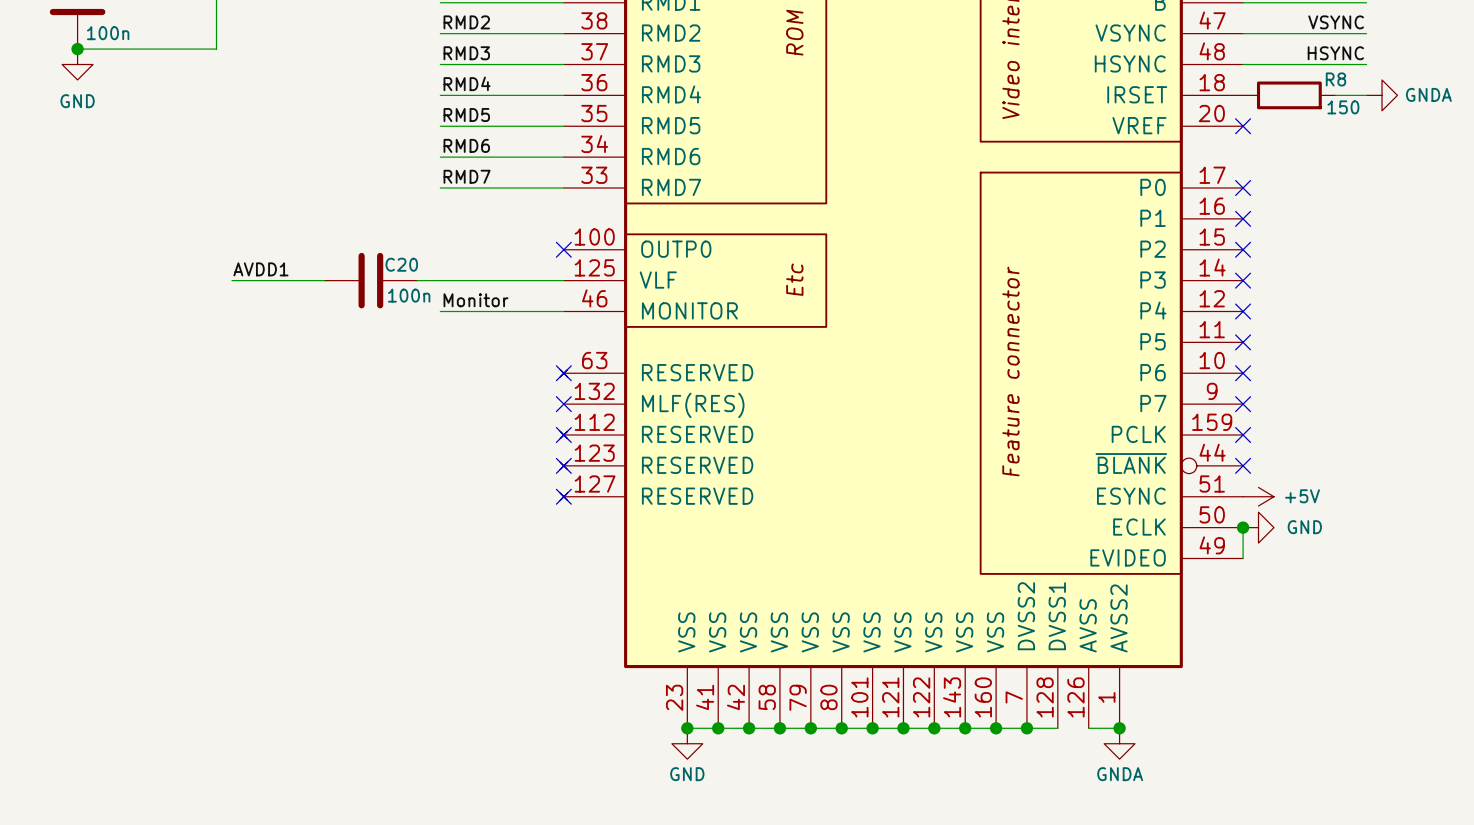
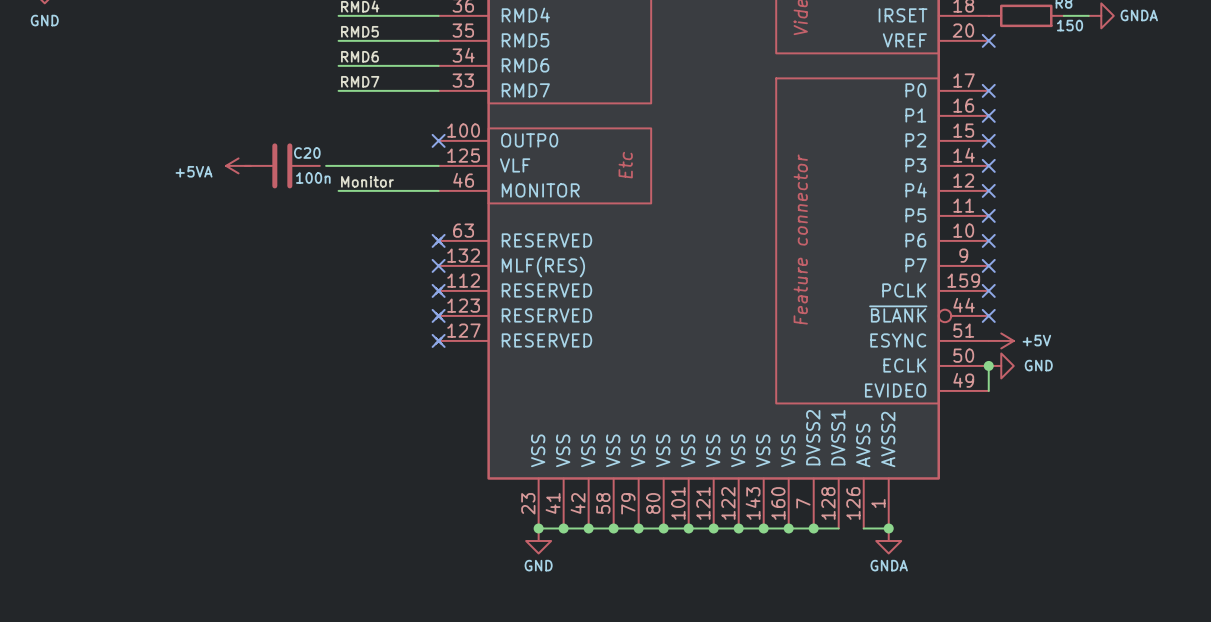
label: AVDD1 (260, 269) -> none
wire: (231, 280) (324, 280) -> none
power symbol: none -> +5VA (238, 165)
wire: (417, 280) (424, 280) -> none

